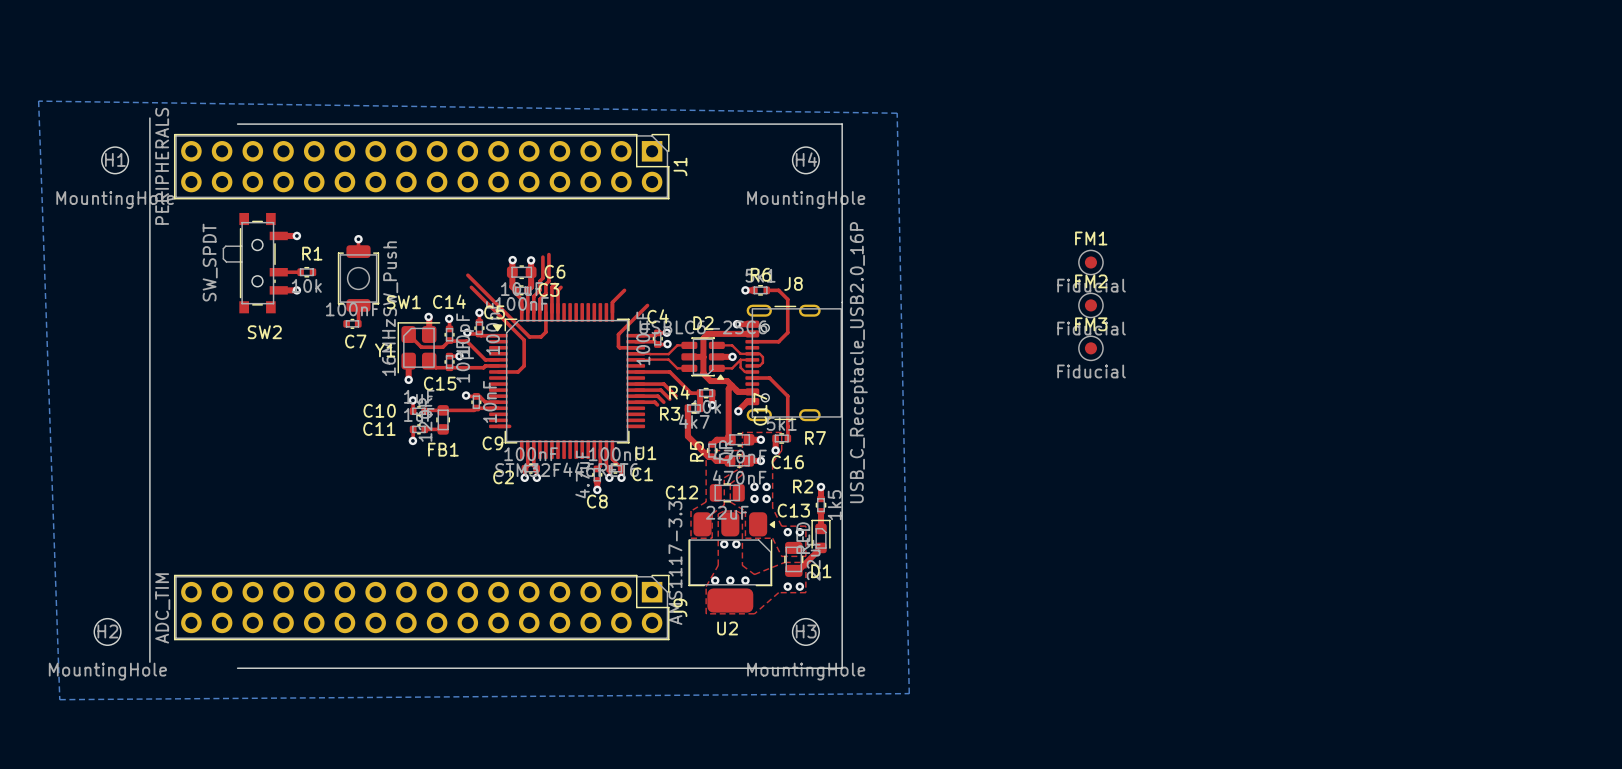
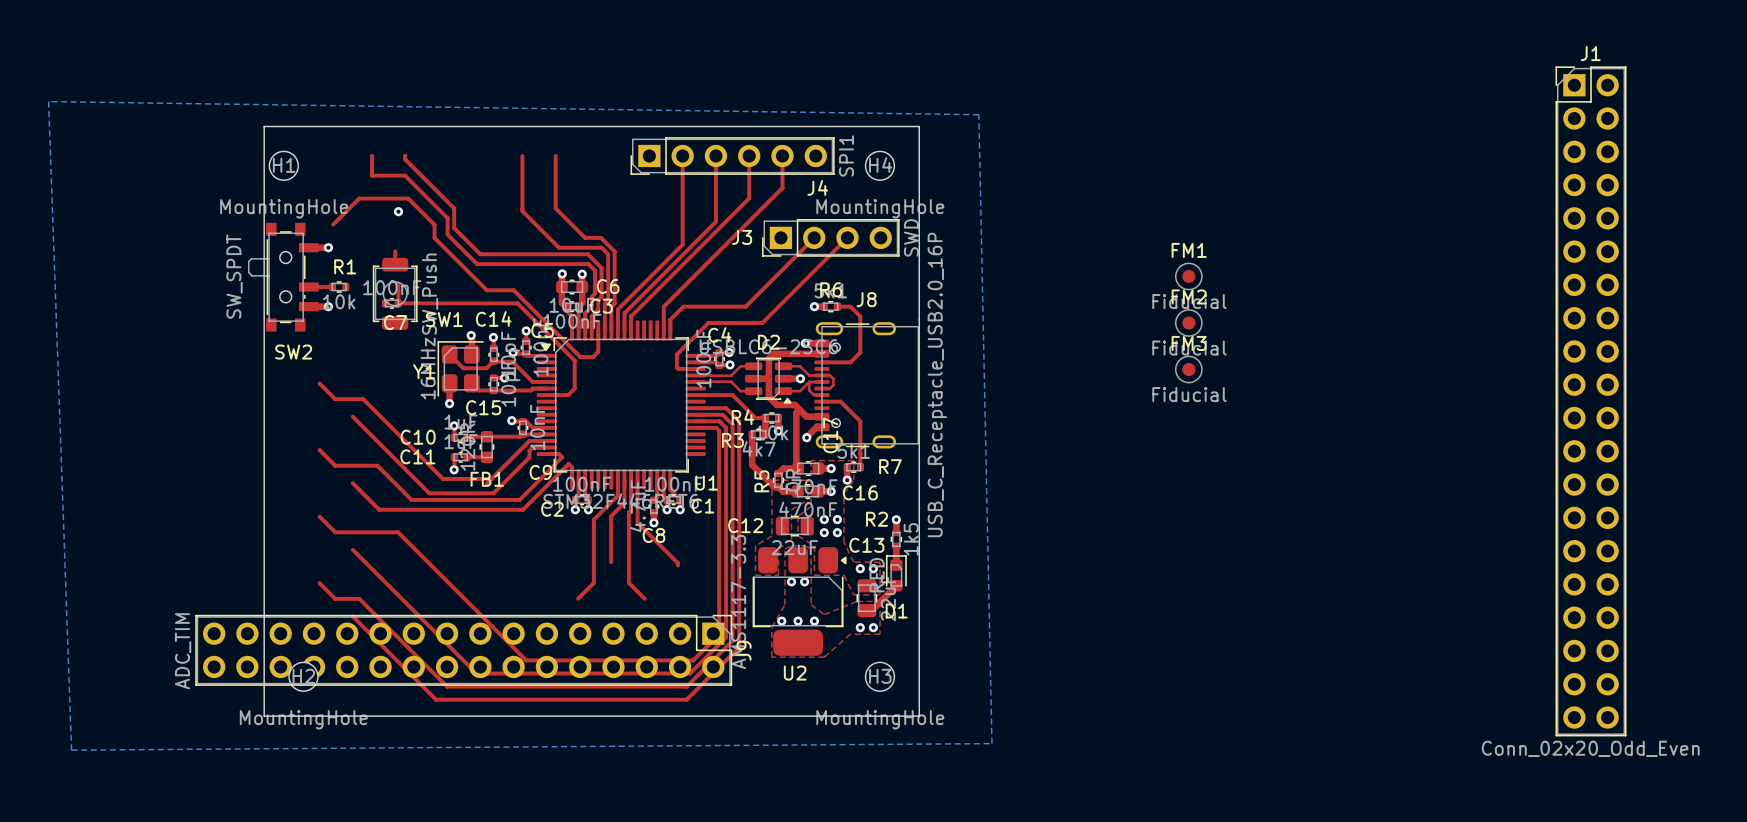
board edge: (149, 118) (149, 662) -> (264, 126) (264, 716)
J1 footprint: [173, 133, 670, 200] -> [1555, 66, 1627, 737]
top track: none -> (372, 155) (372, 175) (405, 175) (447, 218) (447, 234) (477, 264) (588, 264) (595, 270)
top track: none -> (405, 156) (405, 159) (454, 208) (454, 228) (480, 254) (587, 254) (601, 267)
top track: none -> (522, 155) (522, 211) (558, 247) (601, 247) (608, 254) (608, 300)
top track: none -> (555, 155) (555, 208) (585, 237) (601, 237) (614, 251) (614, 303)
top track: none -> (682, 155) (682, 244) (617, 309) (617, 330)
top track: none -> (715, 155) (715, 221) (624, 313) (624, 330)
J4: none -> SPI1 (732, 155)
top track: none -> (749, 155) (749, 198) (631, 316) (631, 330)
top track: none -> (782, 155) (782, 187) (663, 306) (663, 330)
H1 position: (115, 160) -> (283, 165)
J1 value: PERIPHERALS (162, 166) -> Conn_02x20_Odd_Even (1590, 748)
J1 name position: J1 (680, 166) -> J1 (1590, 53)
top track: none -> (333, 224) (359, 198) (408, 198) (434, 224) (434, 237) (486, 290) (513, 290)
J3: none -> SWD (830, 237)
top track: none -> (847, 237) (762, 323) (708, 323)
top track: none -> (814, 238) (745, 306) (683, 306)
via position: (358, 239) -> (398, 211)
top track: none -> (398, 303) (517, 303)
top track: (358, 305) (358, 323) -> (398, 283) (398, 303)
C7 position: (352, 323) -> (391, 303)
top track: none -> (319, 383) (335, 399) (363, 399) (443, 478) (491, 478)
top track: none -> (352, 416) (429, 493) (493, 493) (529, 457) (529, 450) (532, 447) (546, 447)
top track: none -> (739, 421) (739, 647) (686, 699) (436, 699) (352, 616)
top track: none -> (732, 424) (732, 640) (686, 686) (447, 686) (359, 598) (335, 598) (319, 583)
top track: none -> (726, 427) (726, 637) (689, 673) (476, 673) (352, 549)
top track: none -> (719, 430) (719, 634) (693, 660) (526, 660) (398, 532) (335, 532) (319, 516)
top track: none -> (546, 440) (529, 440) (486, 483)
top track: none -> (319, 450) (335, 465) (377, 465) (411, 499) (519, 499) (562, 457) (558, 454)
top track: none -> (572, 479) (572, 467) (568, 463) (522, 509) (379, 509) (352, 483)
top track: none -> (617, 479) (617, 495) (593, 519) (593, 582) (578, 598)
top track: none -> (624, 479) (624, 502) (611, 516) (611, 562)
top track: none -> (631, 479) (628, 582) (644, 598)
top track: none -> (637, 479) (637, 522) (677, 563) (677, 565)
H2 position: (107, 631) -> (303, 676)

